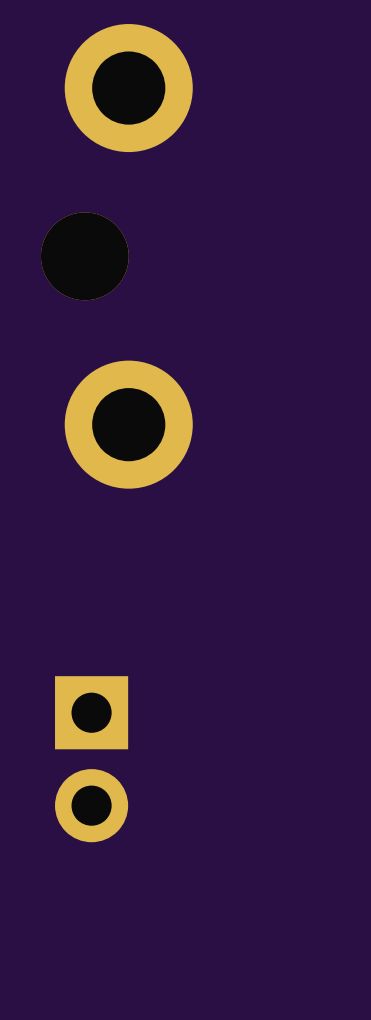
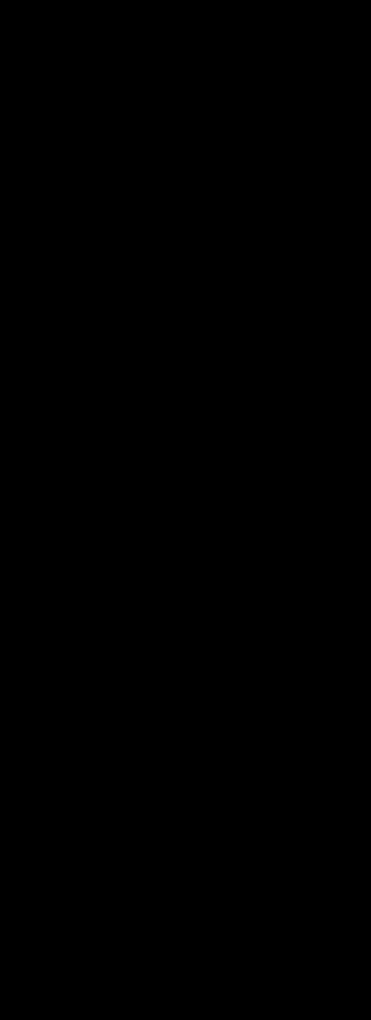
part: (116, 256) -> none
part: (91, 759) -> none

